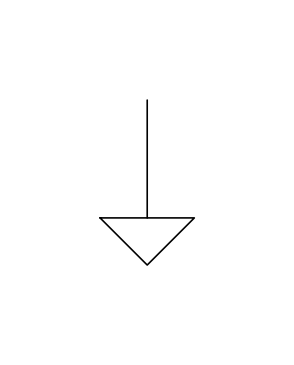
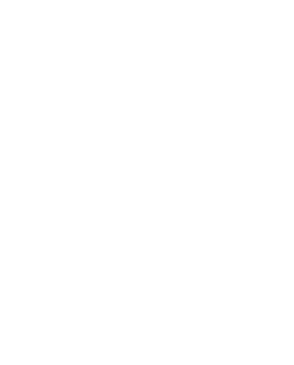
wire: (147, 100) (147, 217) -> none
power symbol: (147, 241) -> none

